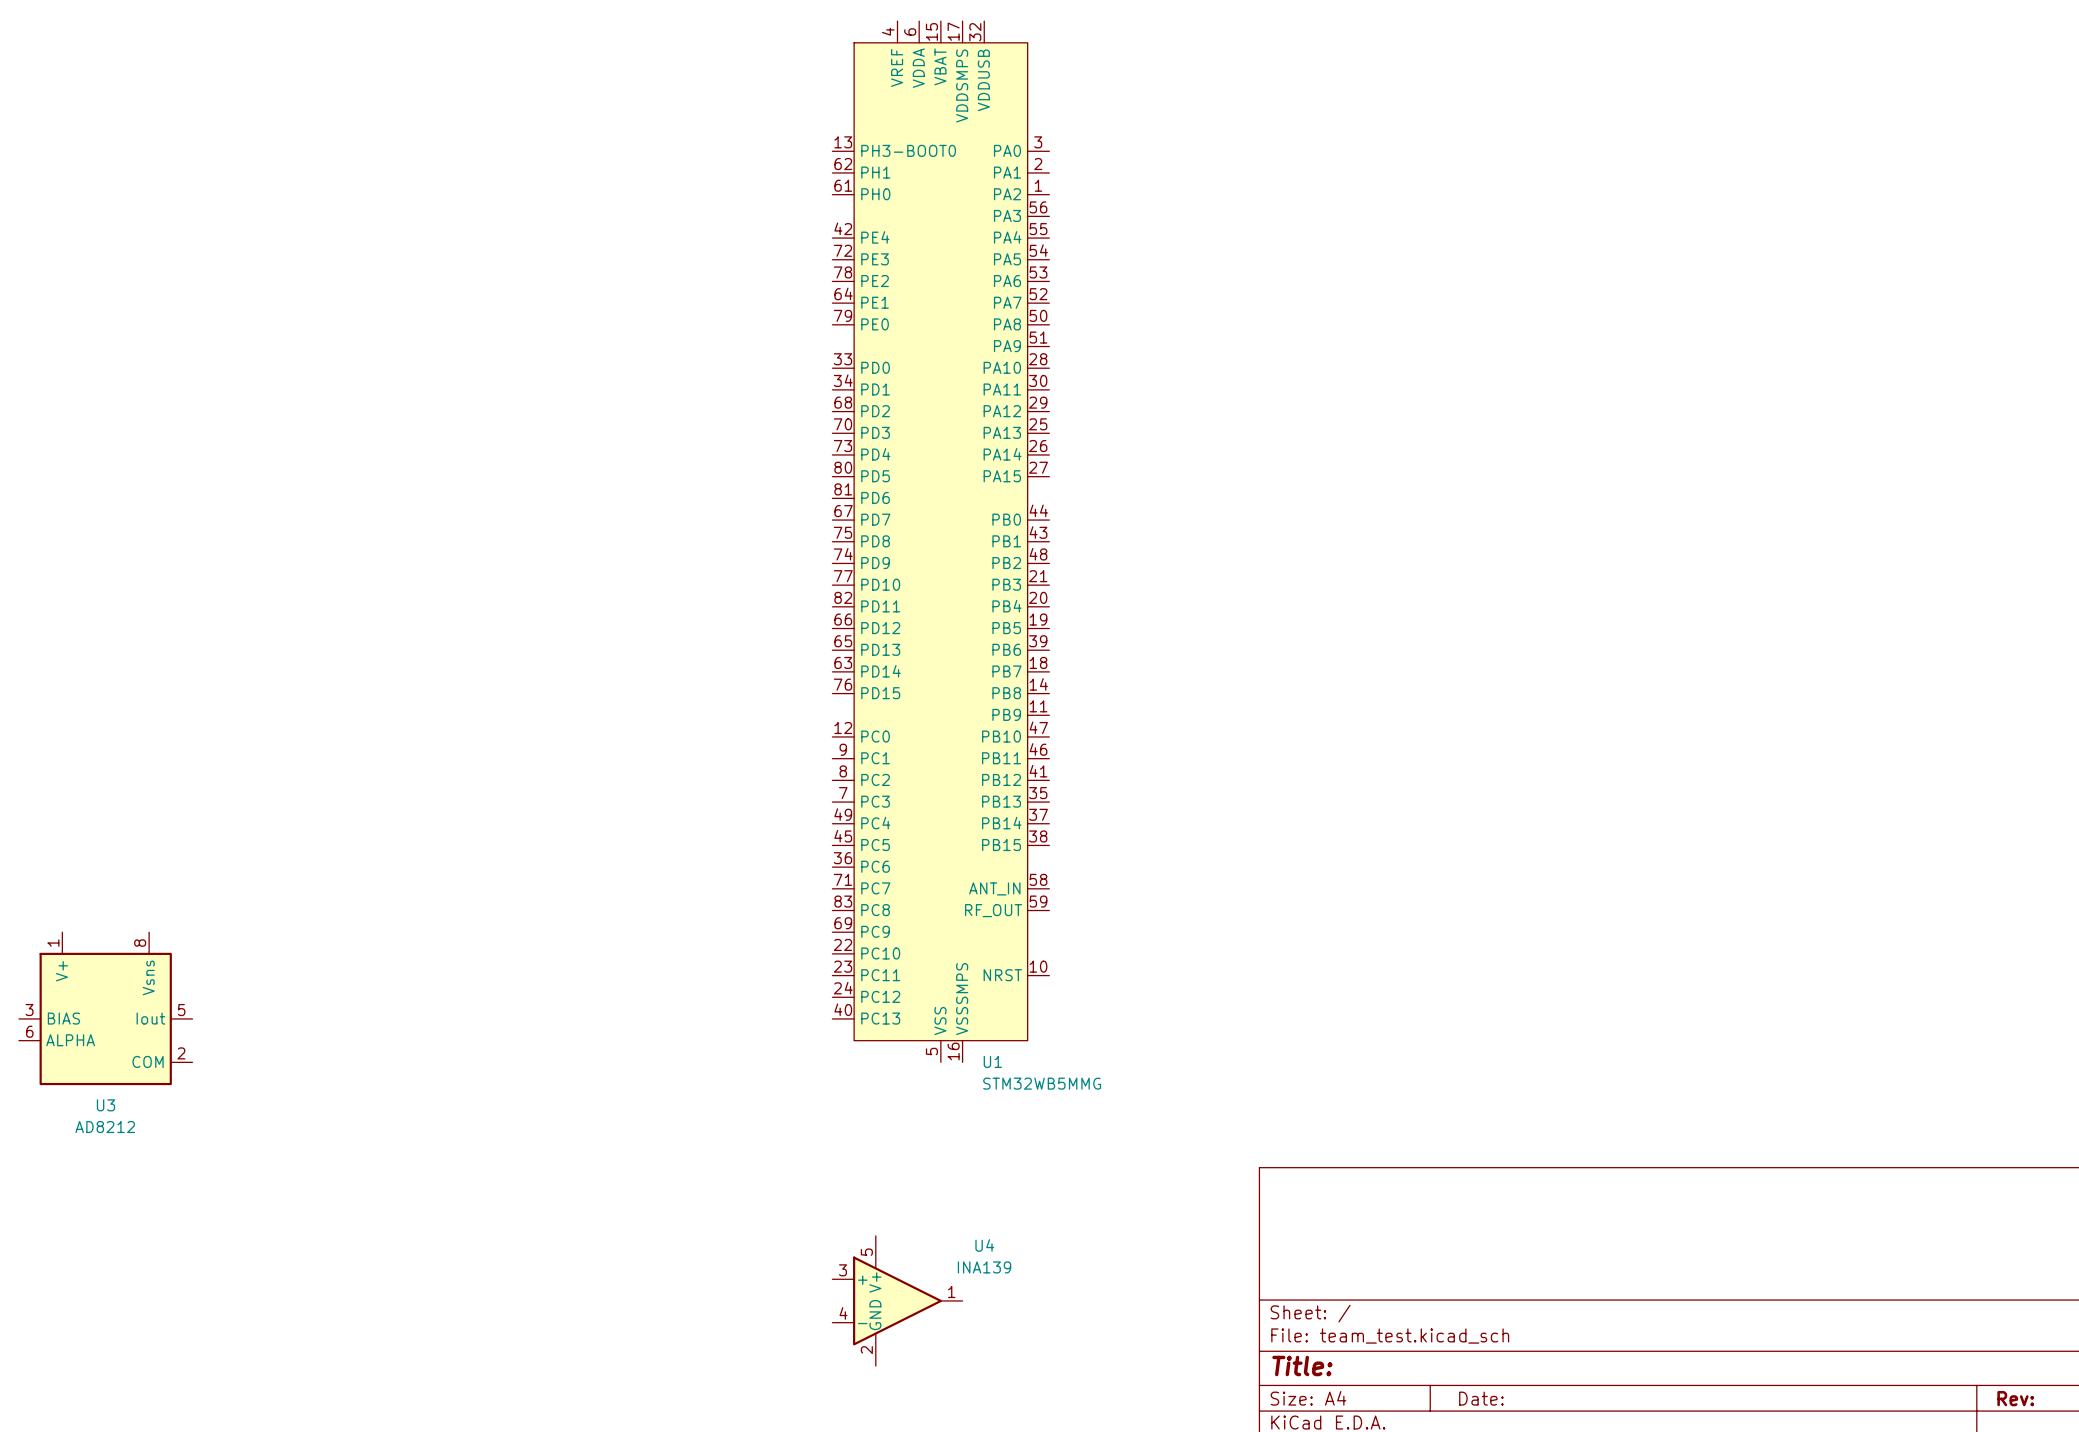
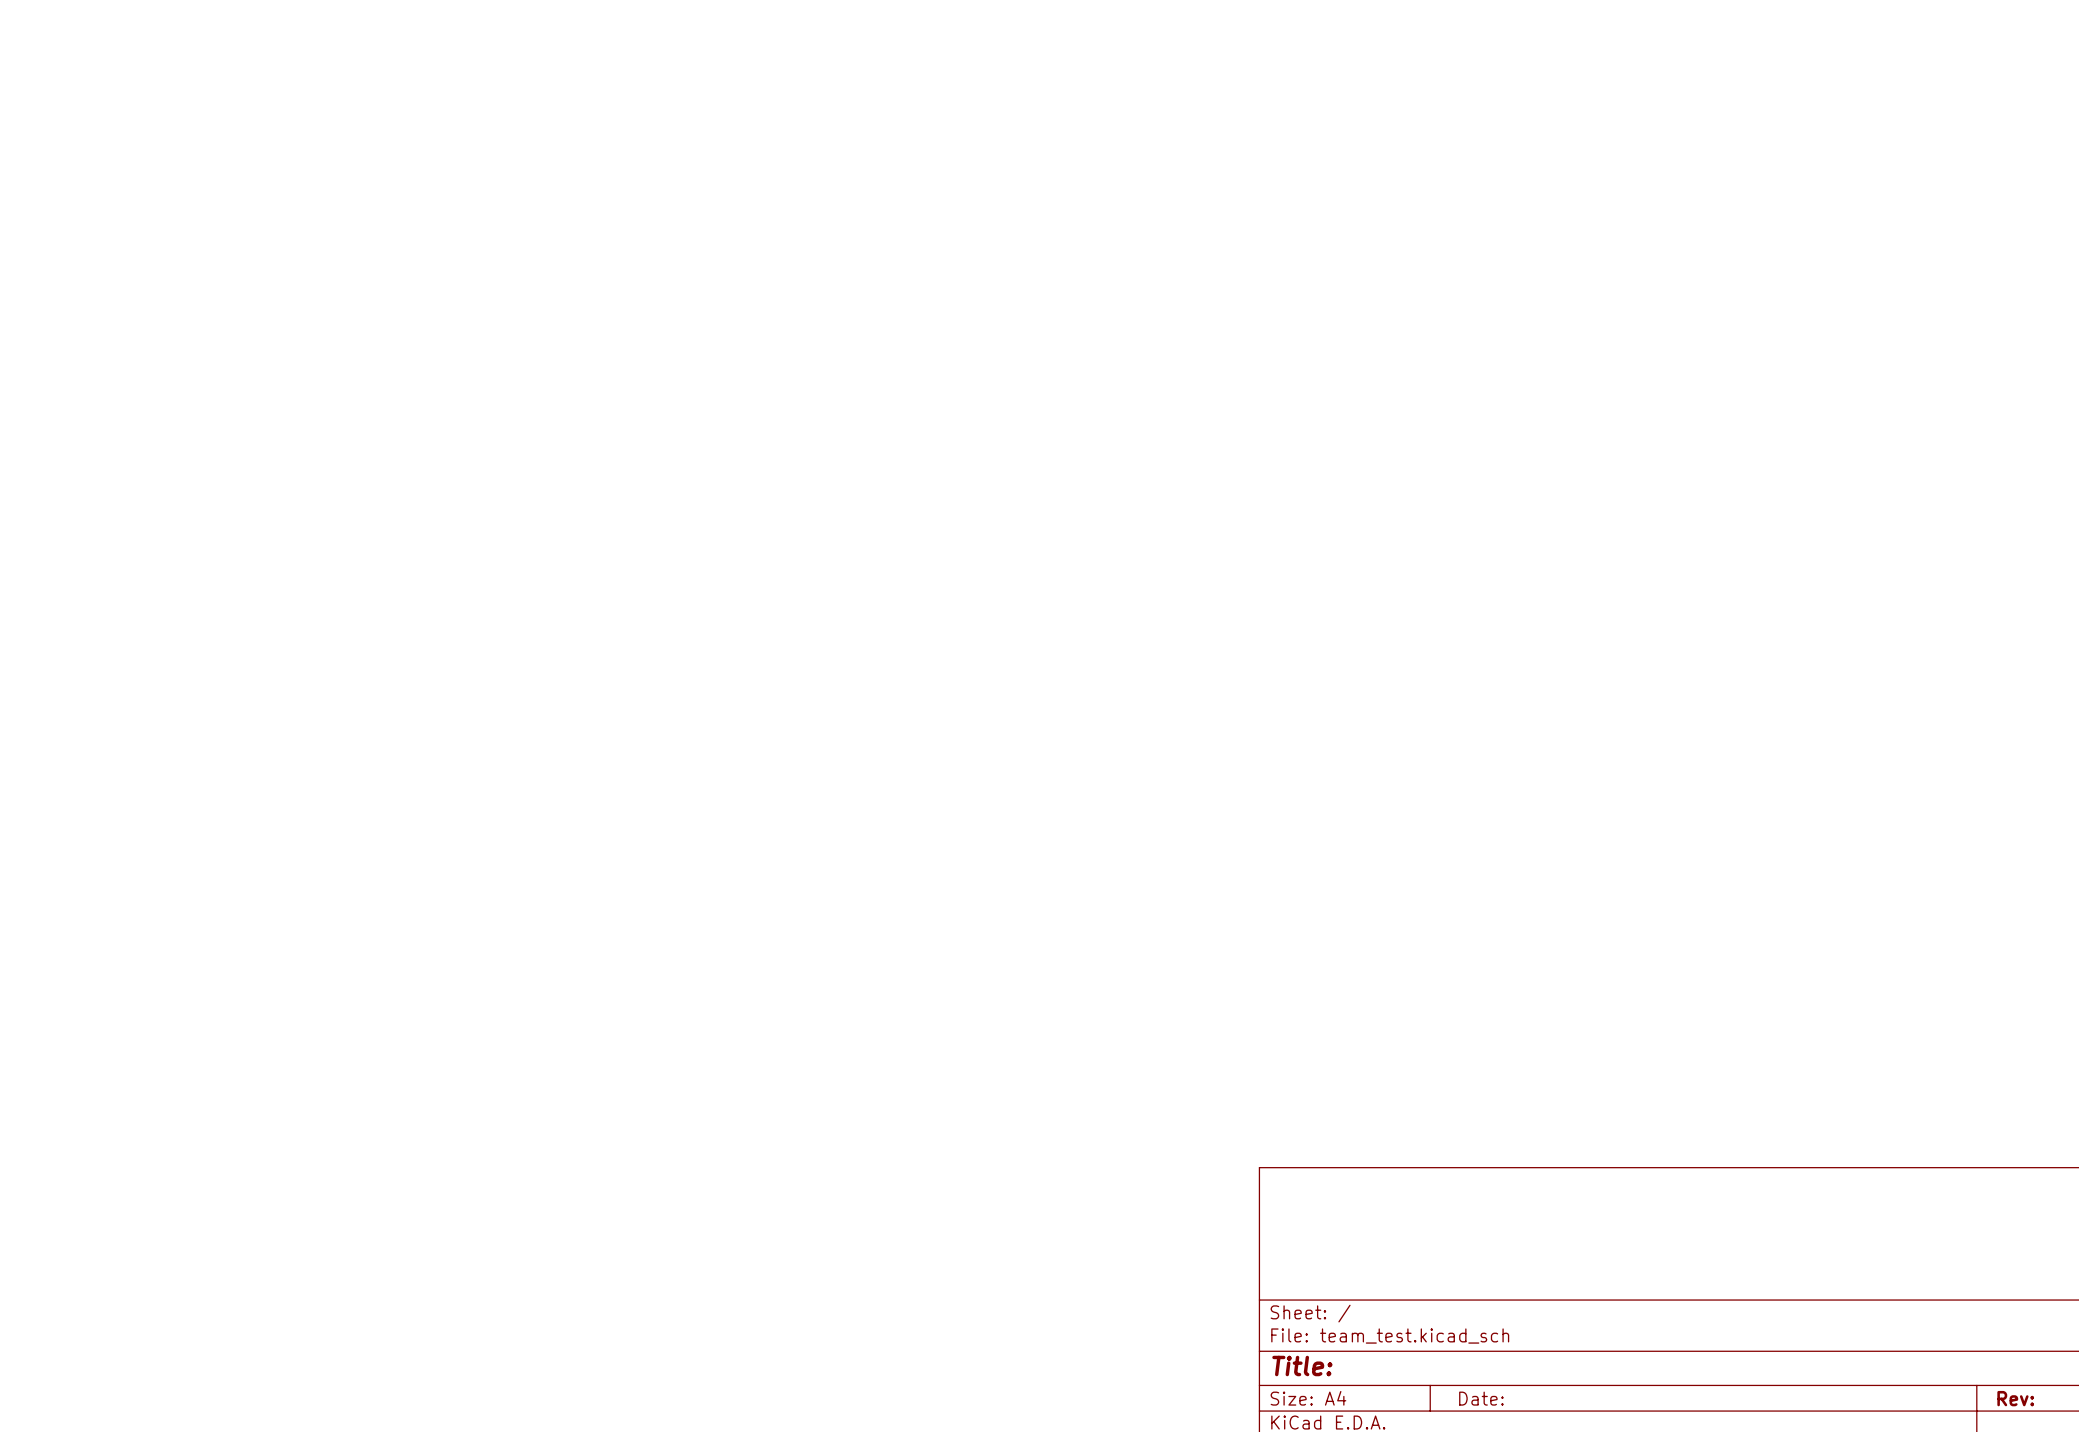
U1: STM32WB5MMG (940, 541) -> none
U3: AD8212 (105, 1008) -> none
U4: INA139 (897, 1300) -> none

